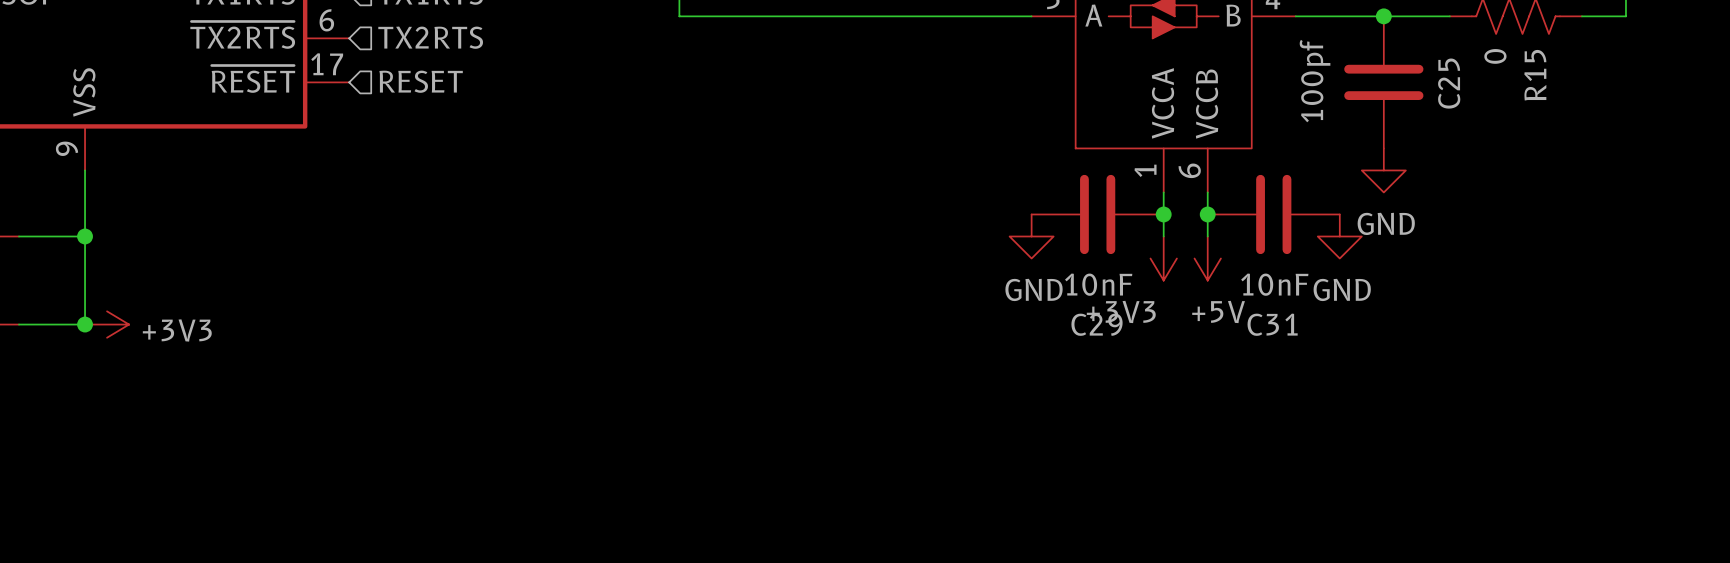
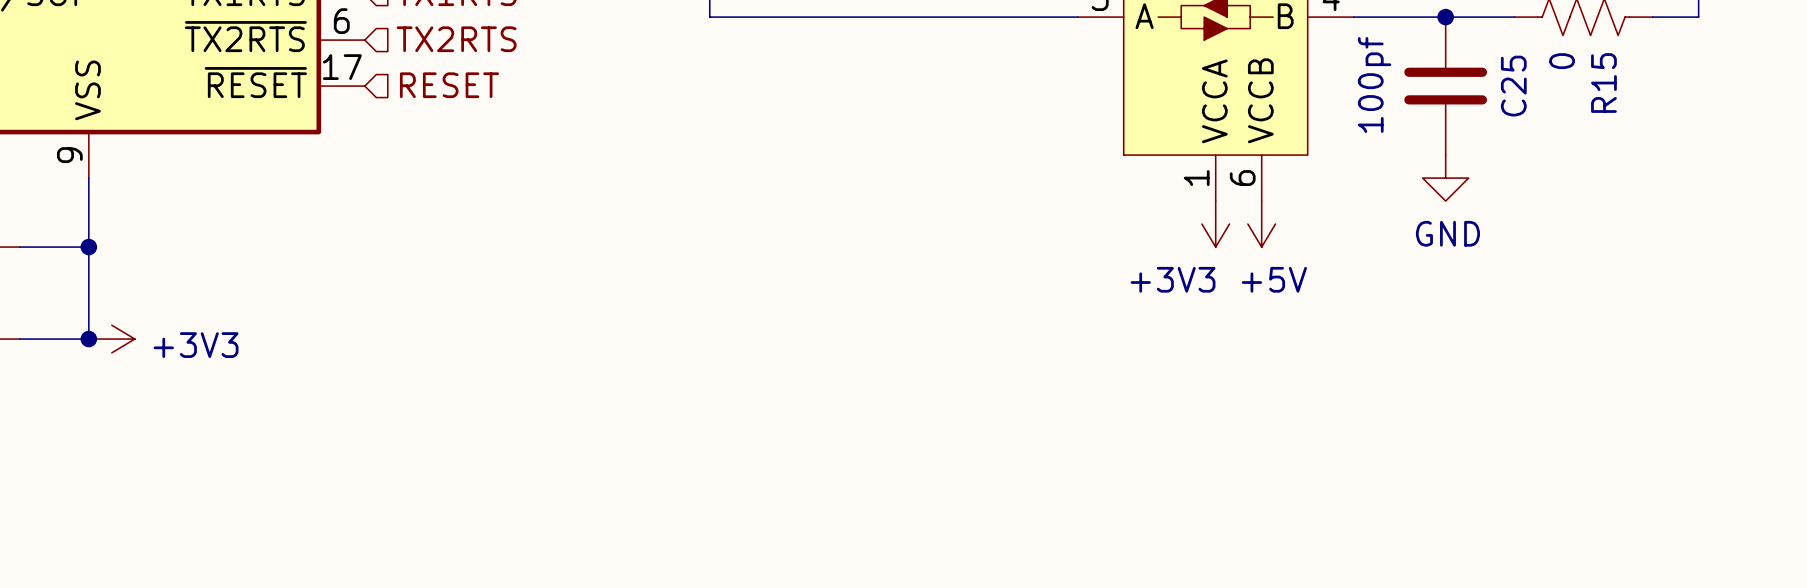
C29: 10nF (1097, 214) -> none
junction: (1163, 214) -> none
junction: (1207, 214) -> none
C31: 10nF (1273, 214) -> none
power symbol: GND (1031, 236) -> none
power symbol: GND (1339, 236) -> none
power symbol position: +3V3 (1163, 258) -> +3V3 (1215, 224)
power symbol position: +5V (1207, 258) -> +5V (1261, 224)

